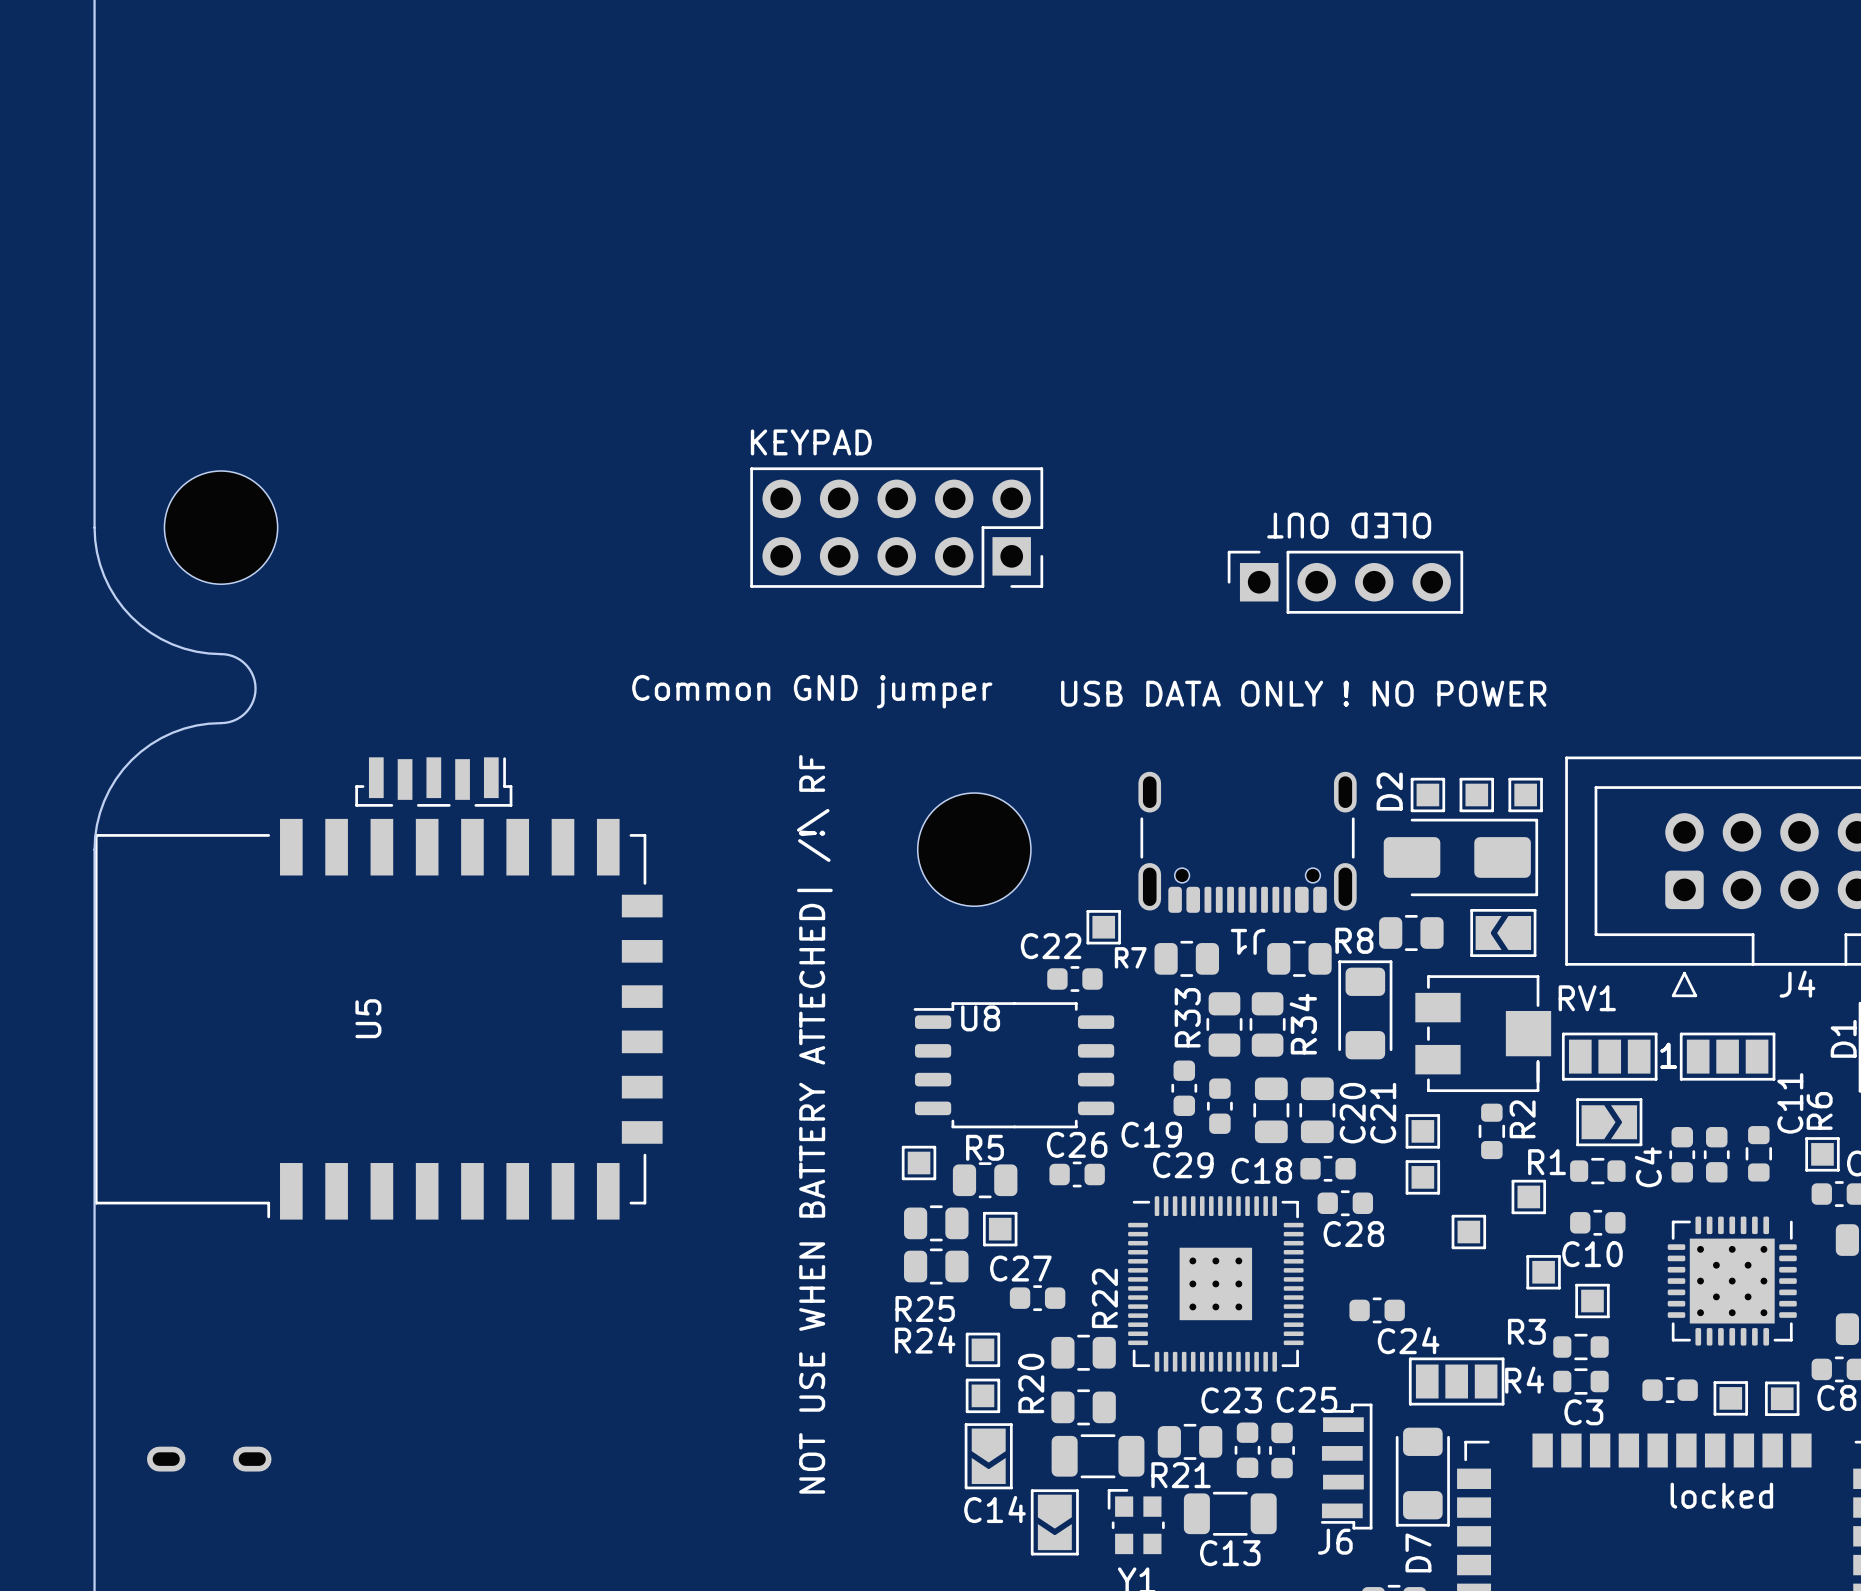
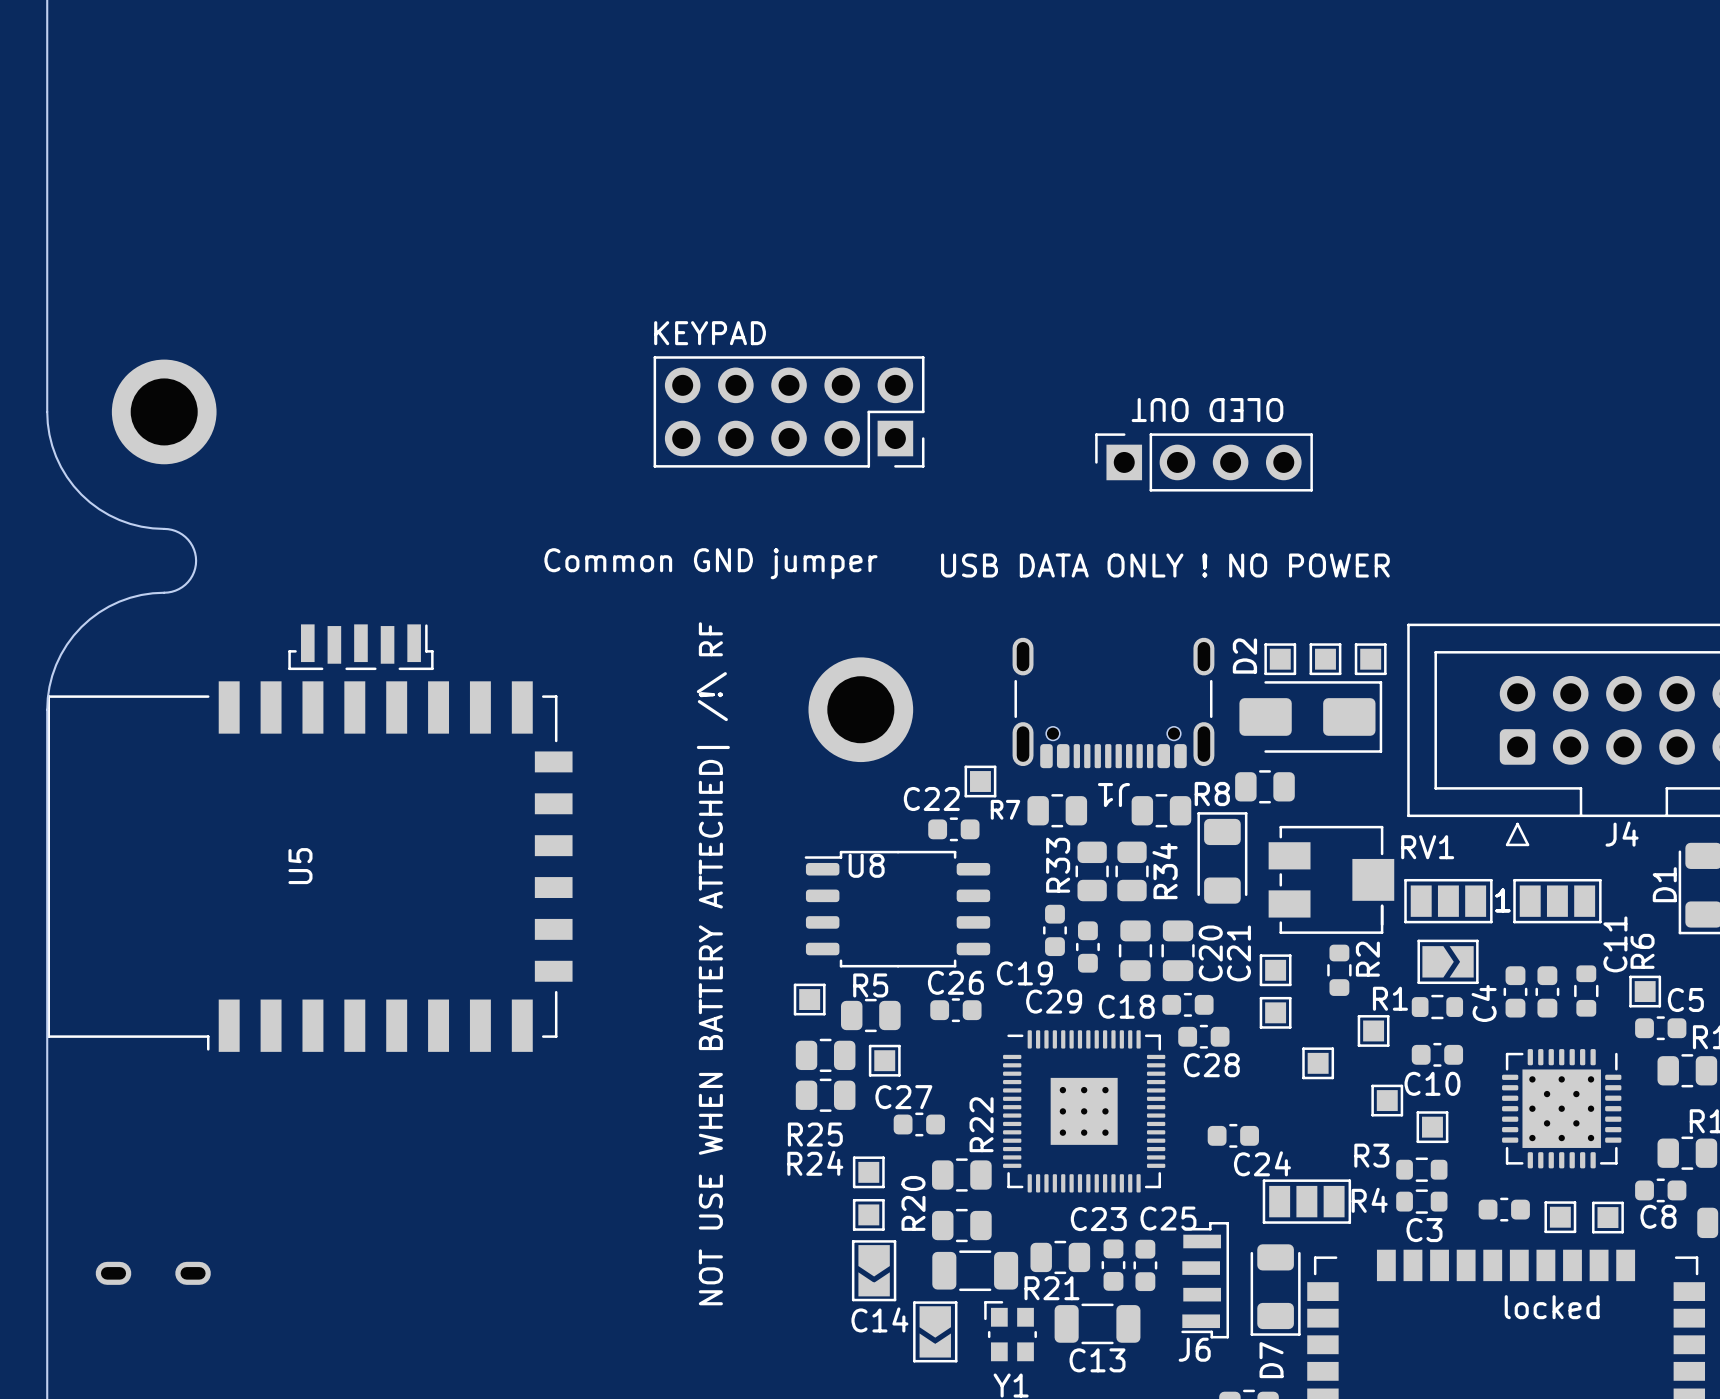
part footprint: [164, 471, 278, 585] -> [111, 359, 217, 465]
part footprint: [917, 793, 1031, 907] -> [808, 657, 914, 763]
part: (1503, 932) -> none

